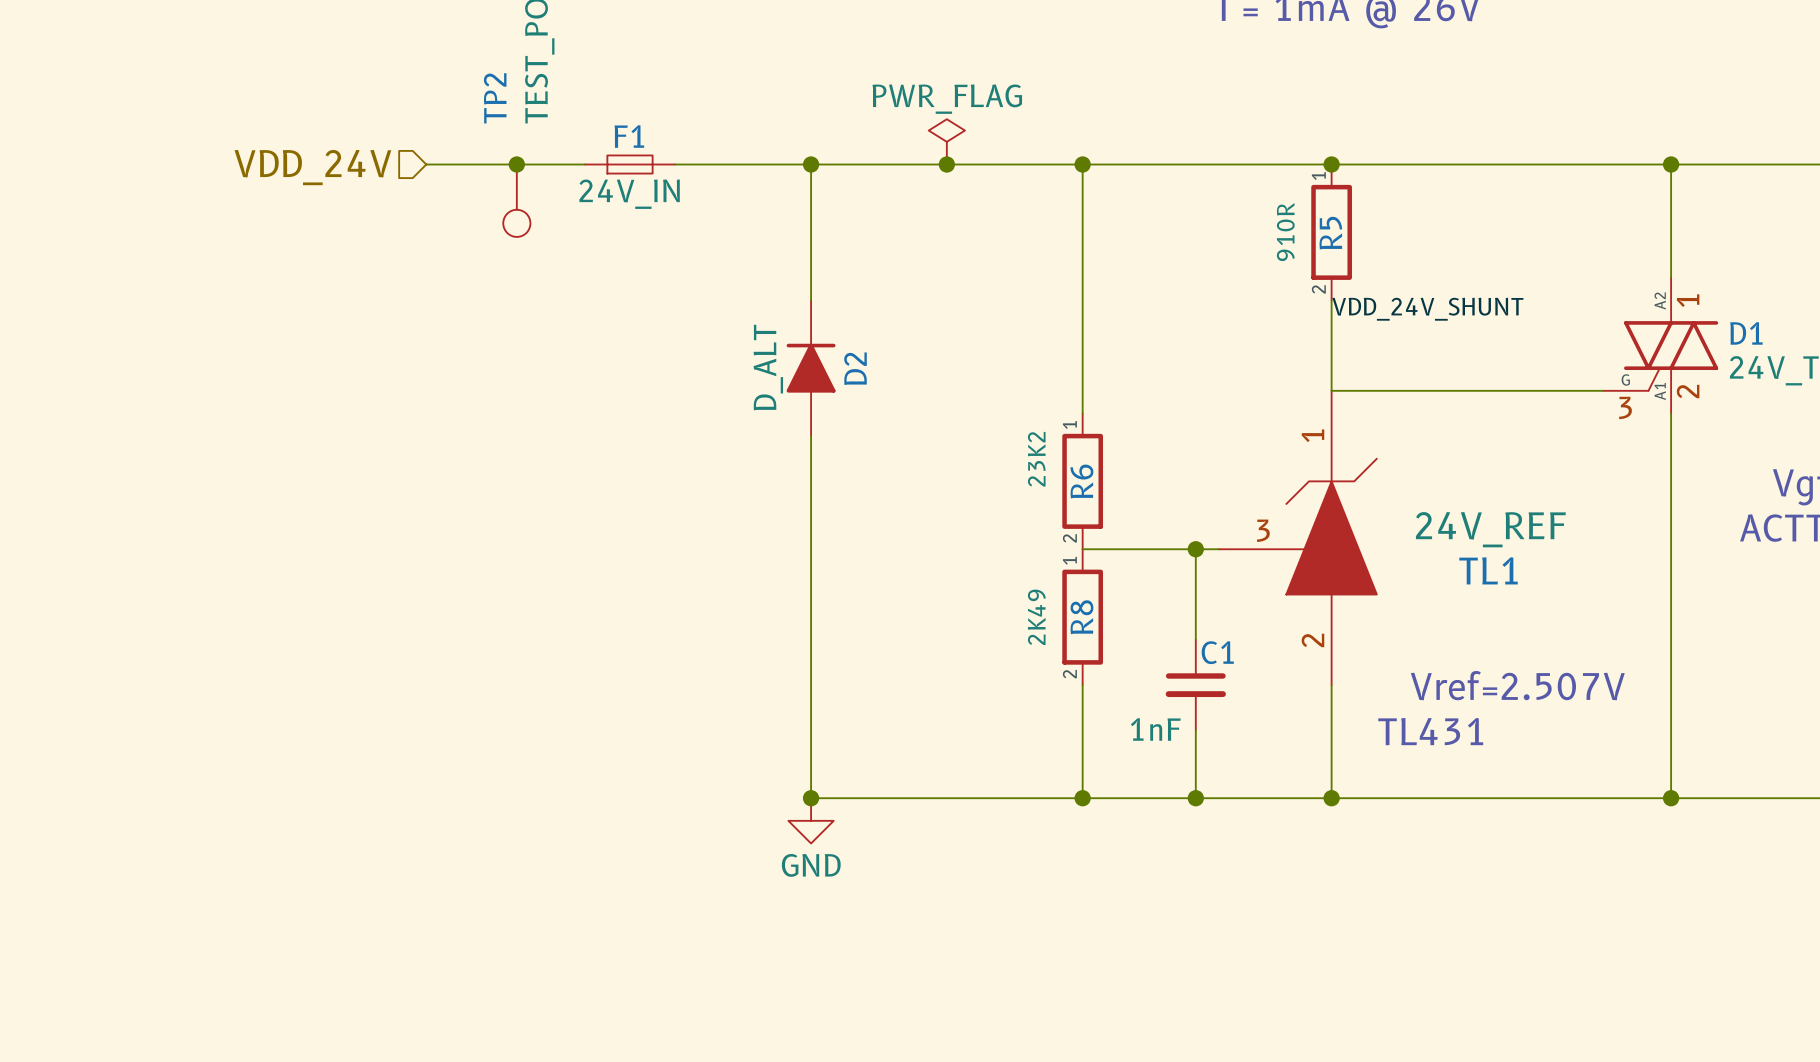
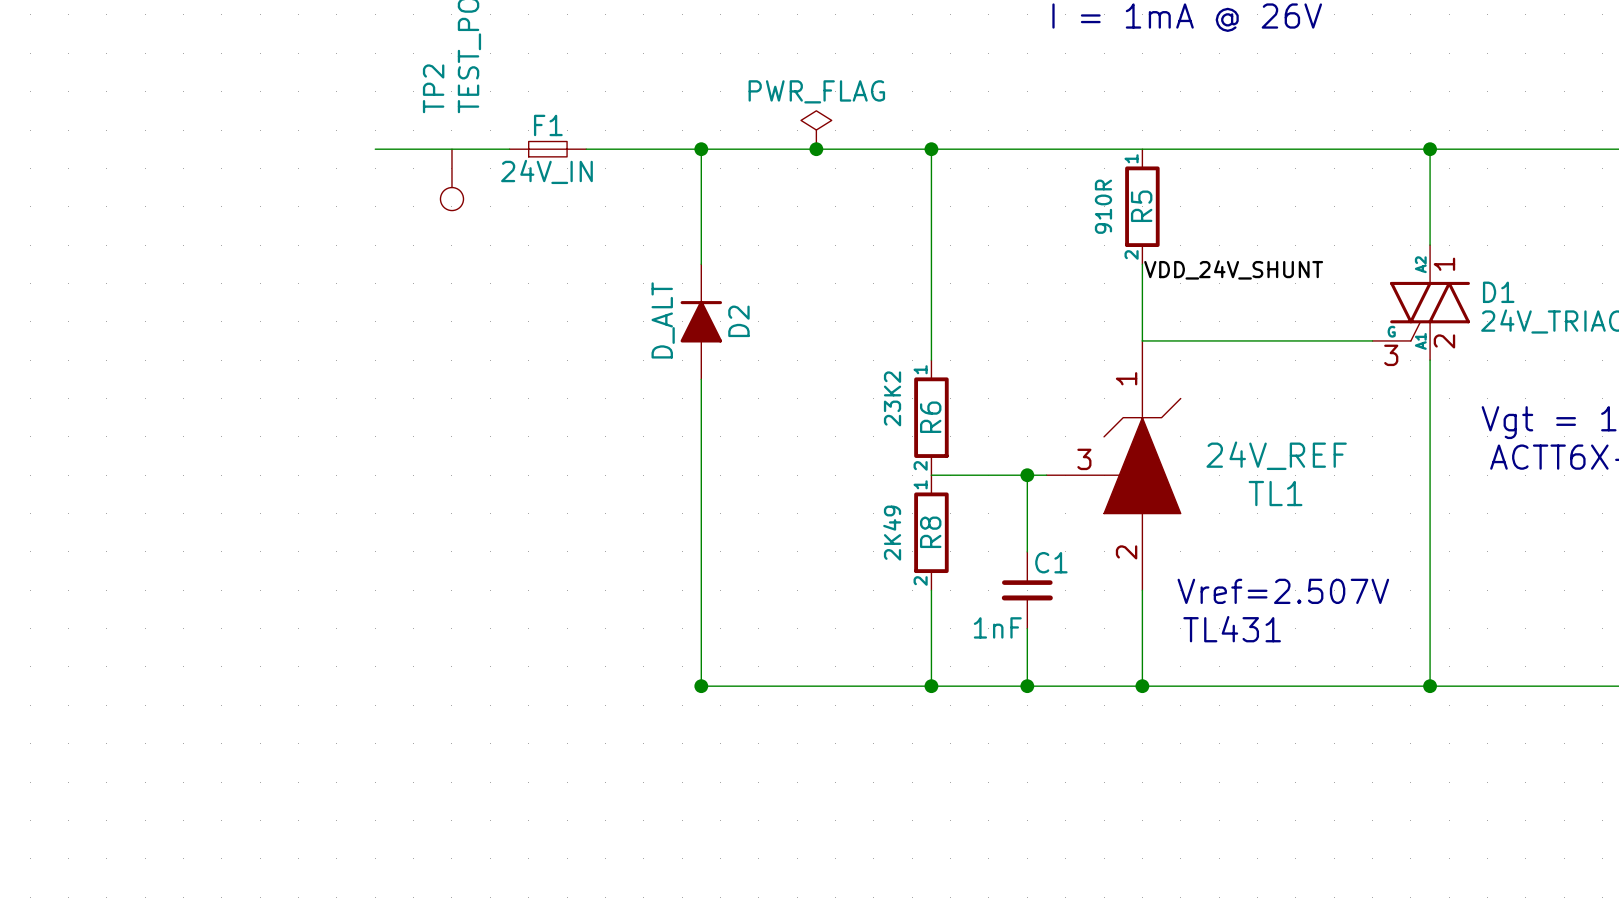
junction: (516, 164) -> none
junction: (1331, 164) -> none
hierarchical label: VDD_24V (312, 167) -> none
power symbol: GND (811, 820) -> none

